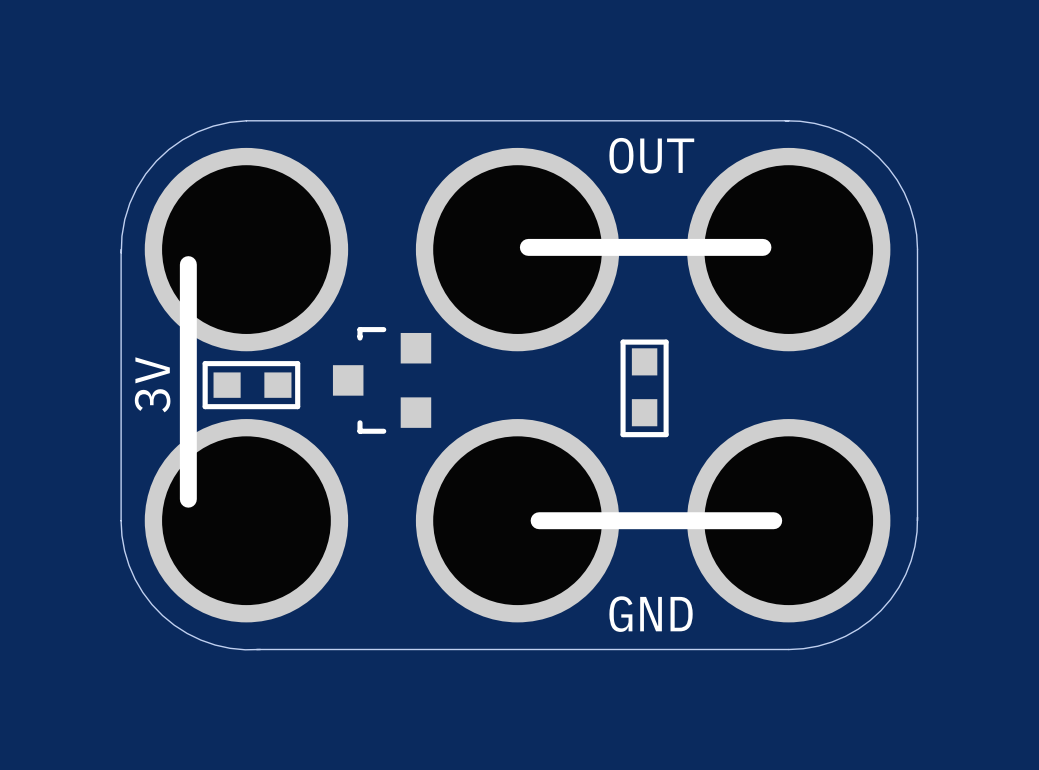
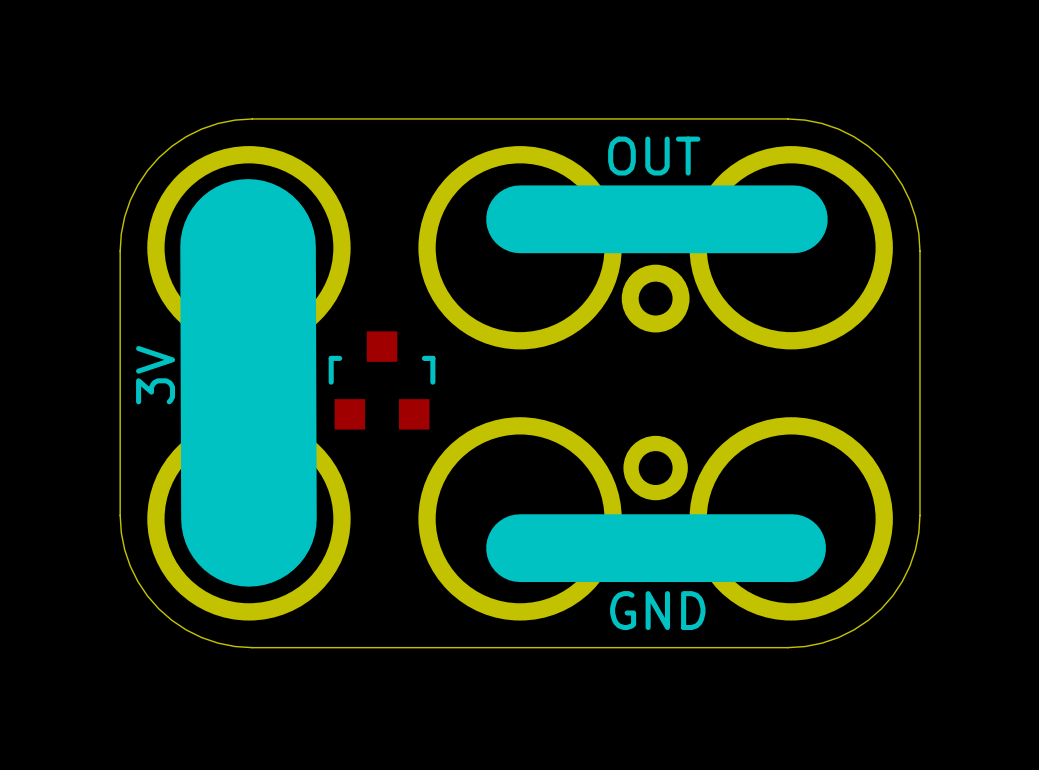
part footprint: [120, 120, 919, 651] -> [119, 118, 921, 649]
text: OUT (651, 155) -> none
line: (528, 247) (762, 247) -> none
line: (188, 264) (188, 499) -> none
part rotation: 0° (382, 380) -> 90° clockwise (382, 380)
text: 3V (152, 384) -> none
part: (644, 388) -> none
line: (539, 520) (773, 520) -> none
text: GND (651, 614) -> none

